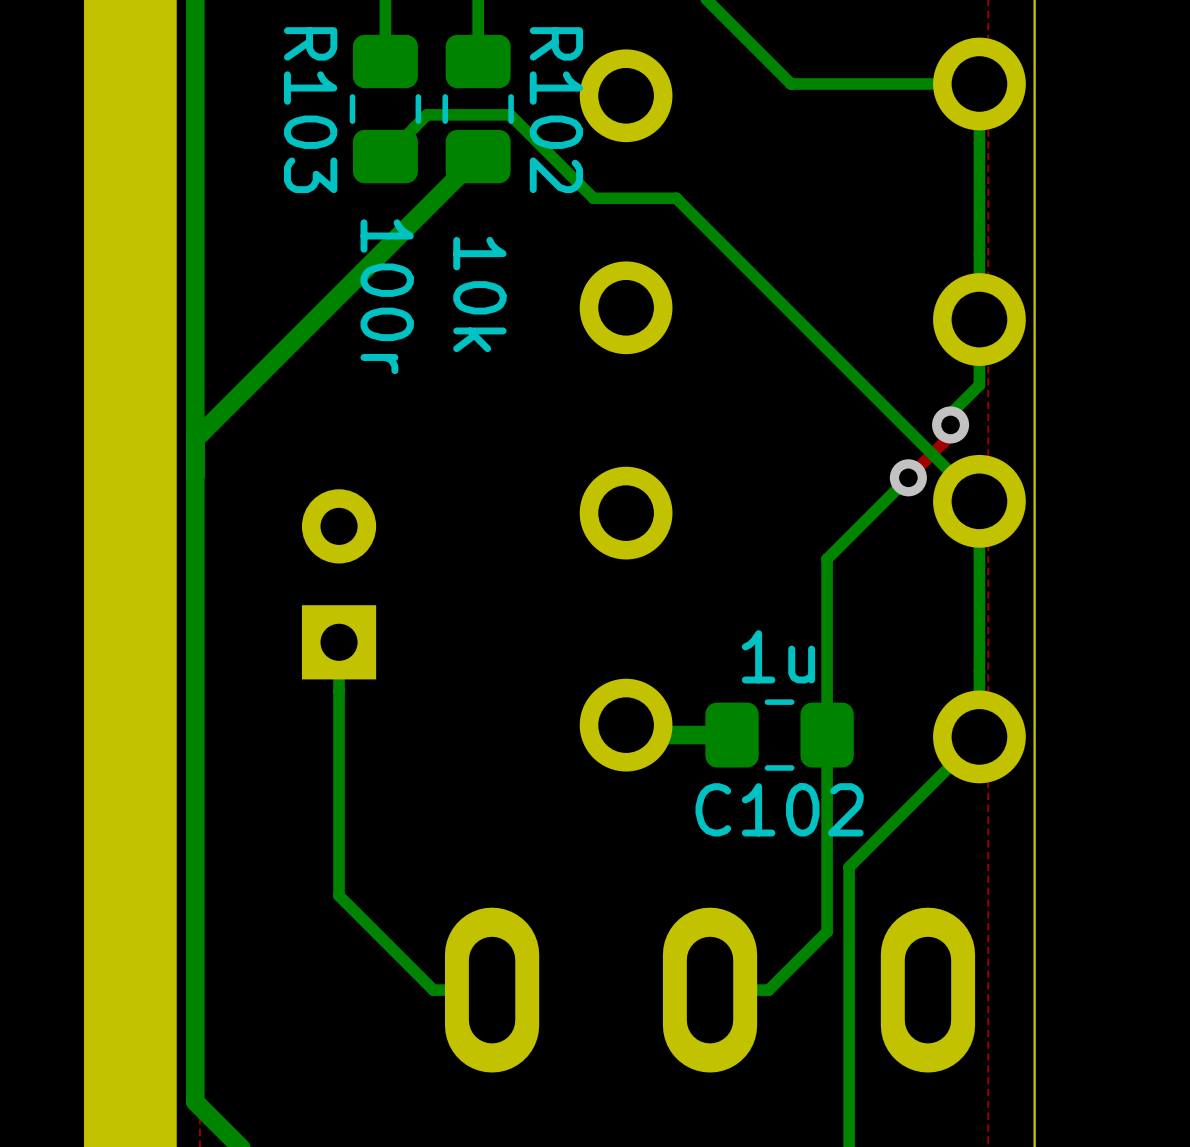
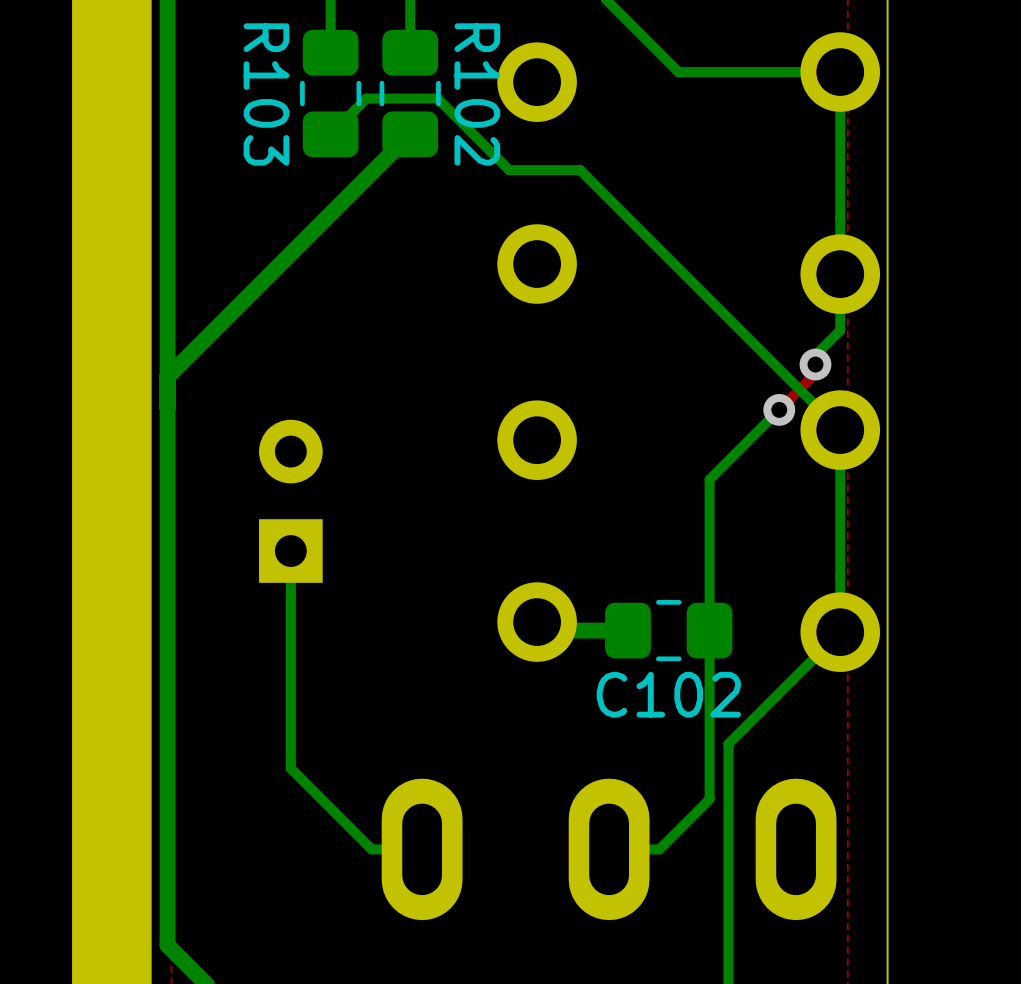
R102 value: 10k (479, 294) -> none
R103 value: 100r (387, 296) -> none
C102 value: 1u (778, 656) -> none

